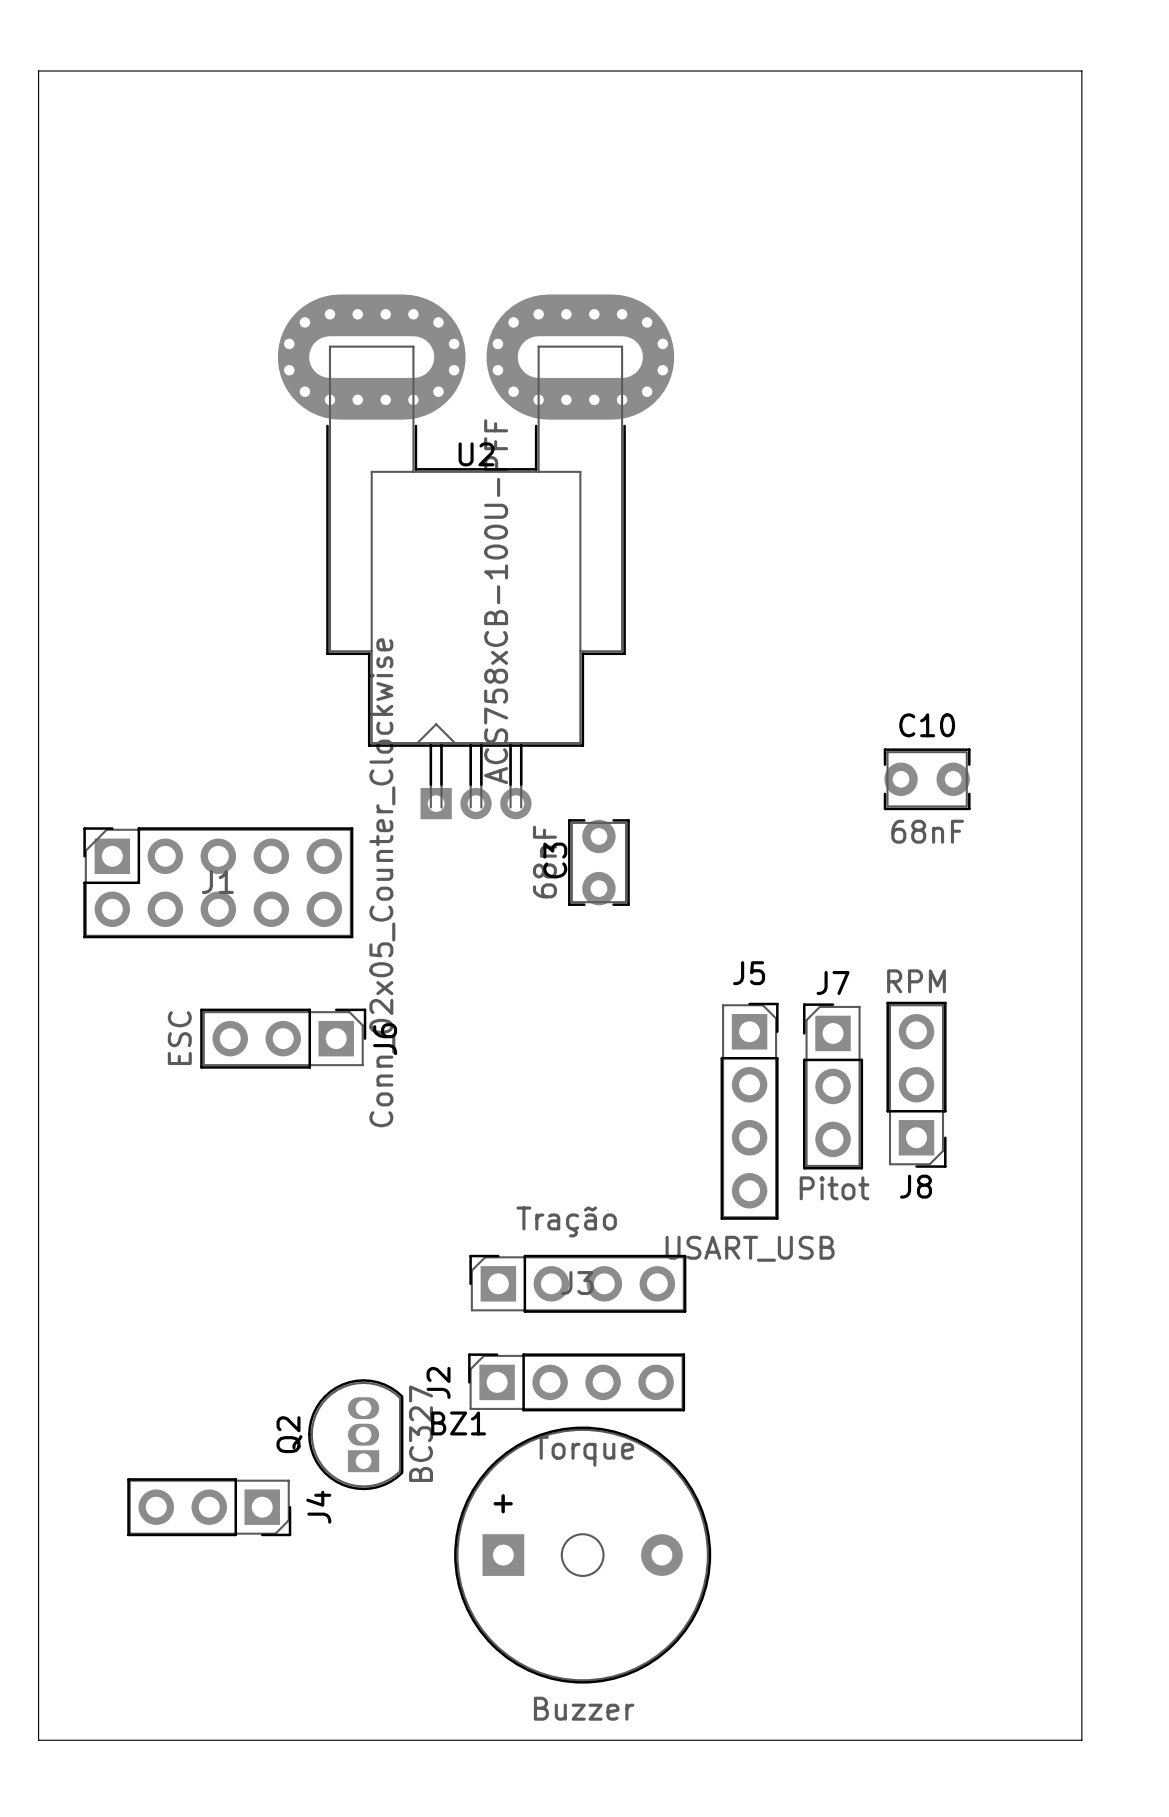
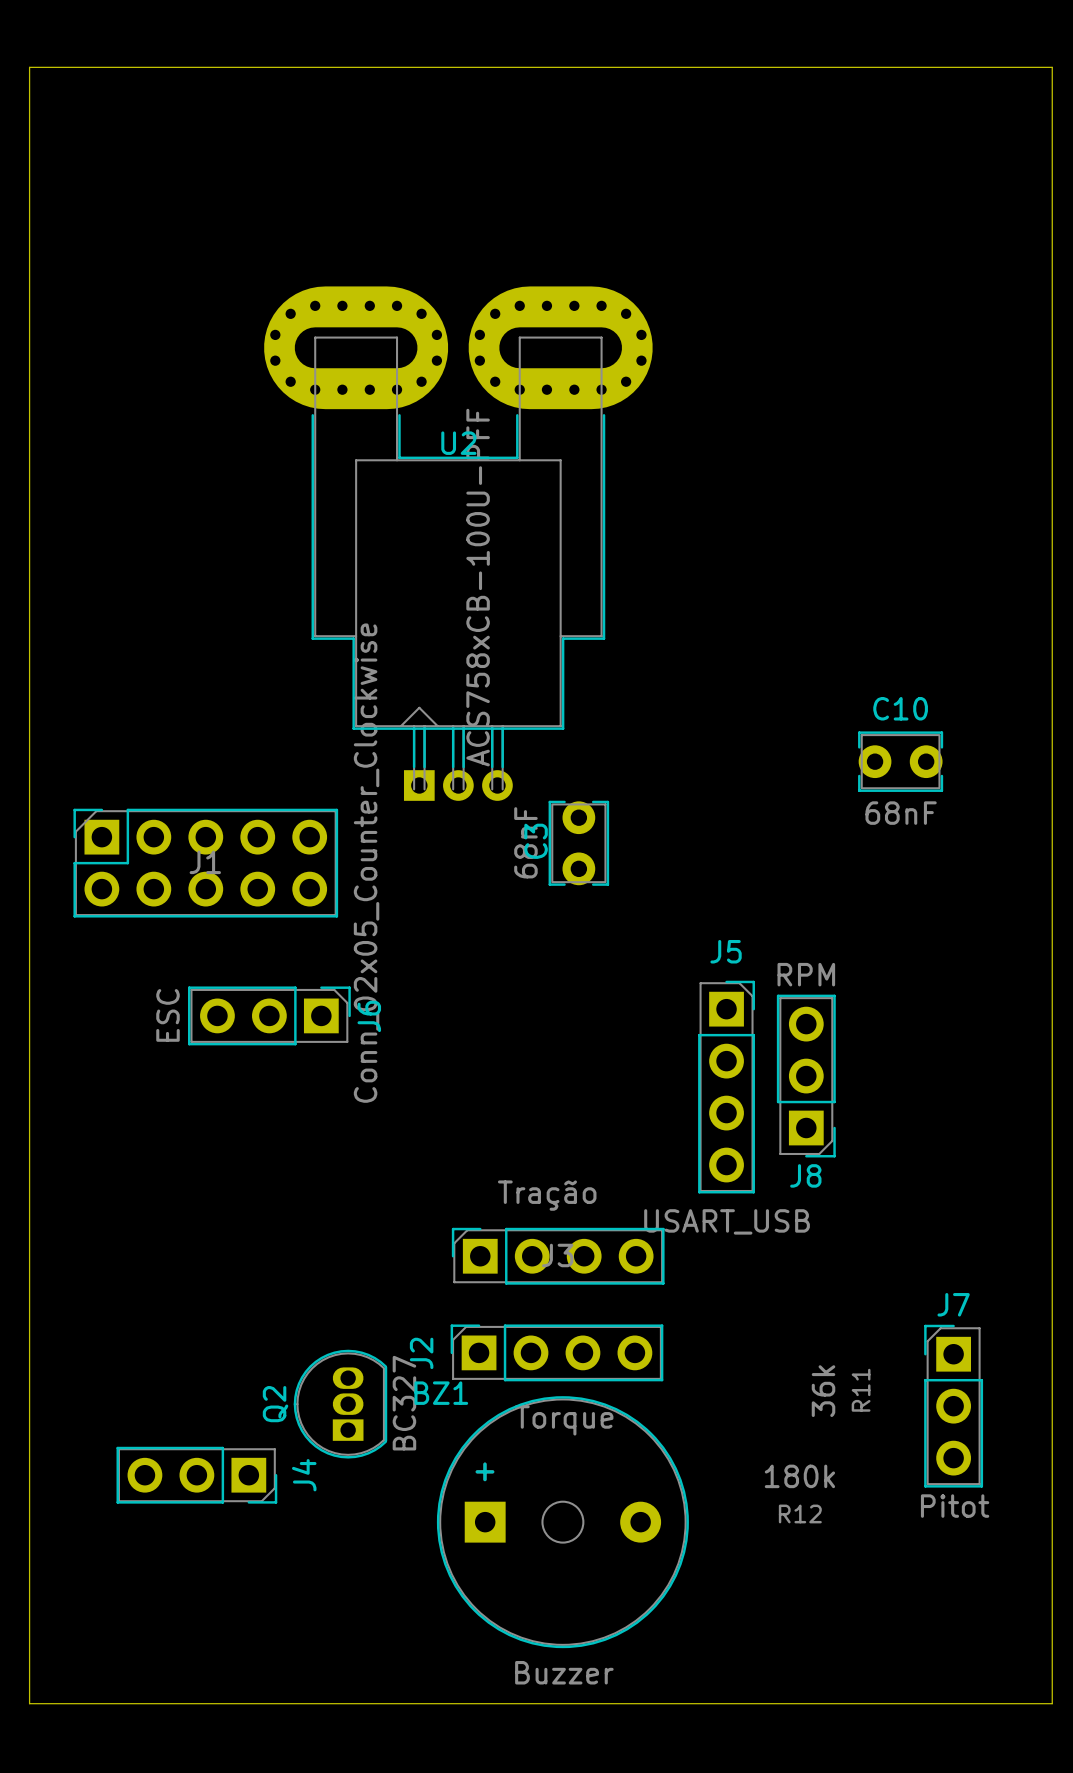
J8 position: (916, 1084) -> (806, 1076)
J7 position: (833, 1086) -> (953, 1406)
R11: none -> 36k (841, 1391)
R12: none -> 180k (799, 1494)

